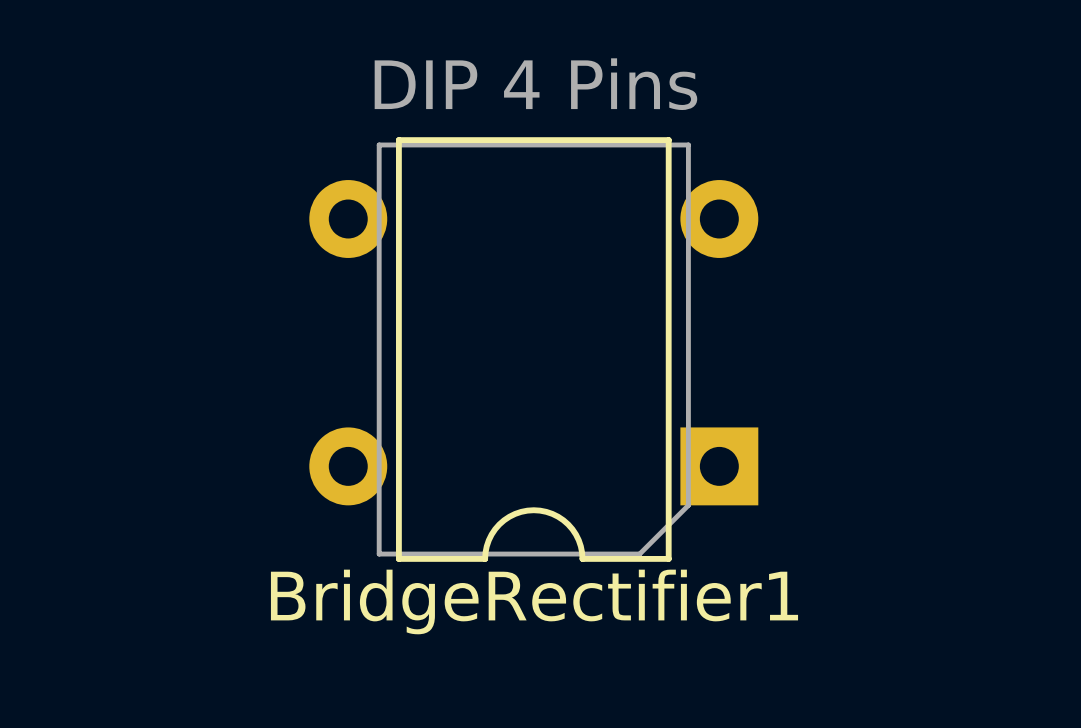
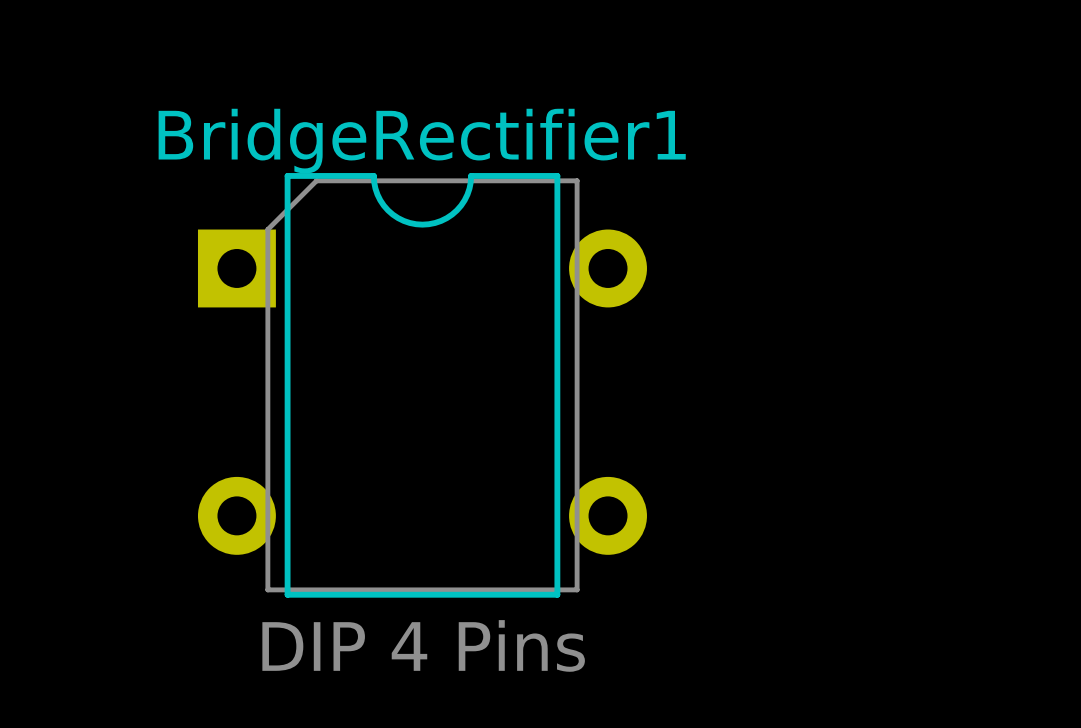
BridgeRectifier1 rotation: 0° (533, 349) -> 180° (422, 385)

